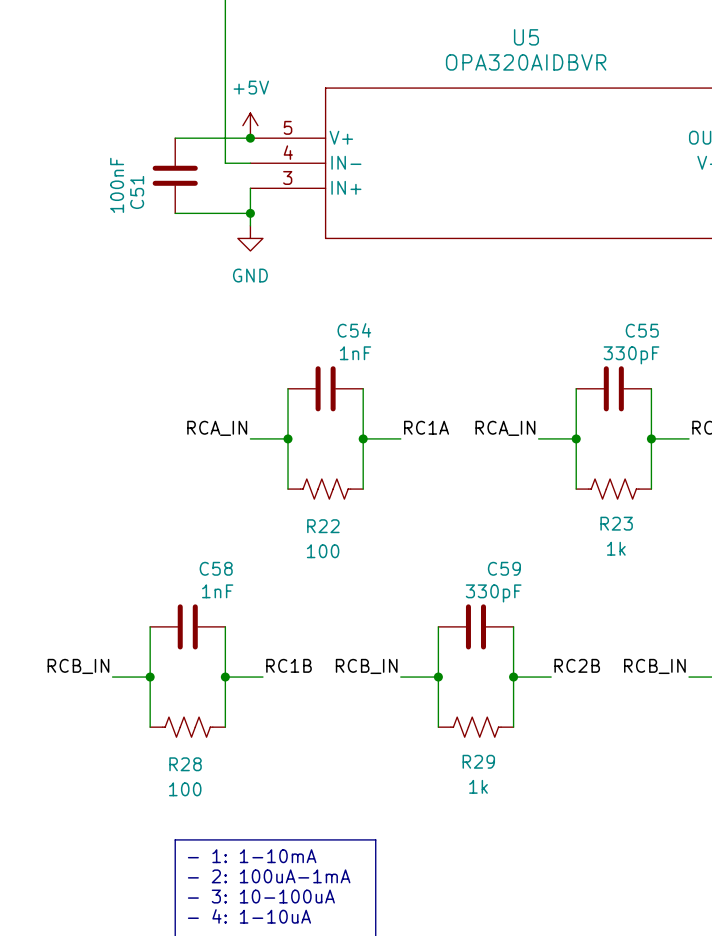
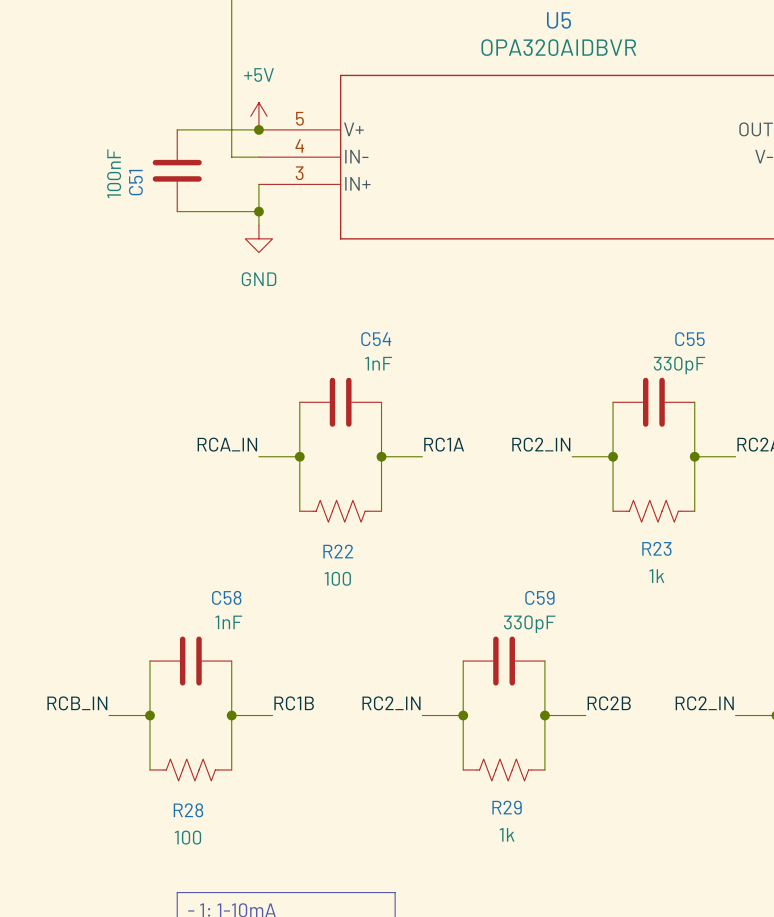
label: RCA_IN (505, 428) -> RC2_IN (541, 444)
label: RCB_IN (366, 666) -> RC2_IN (391, 703)
label: RCB_IN (654, 666) -> RC2_IN (704, 703)

